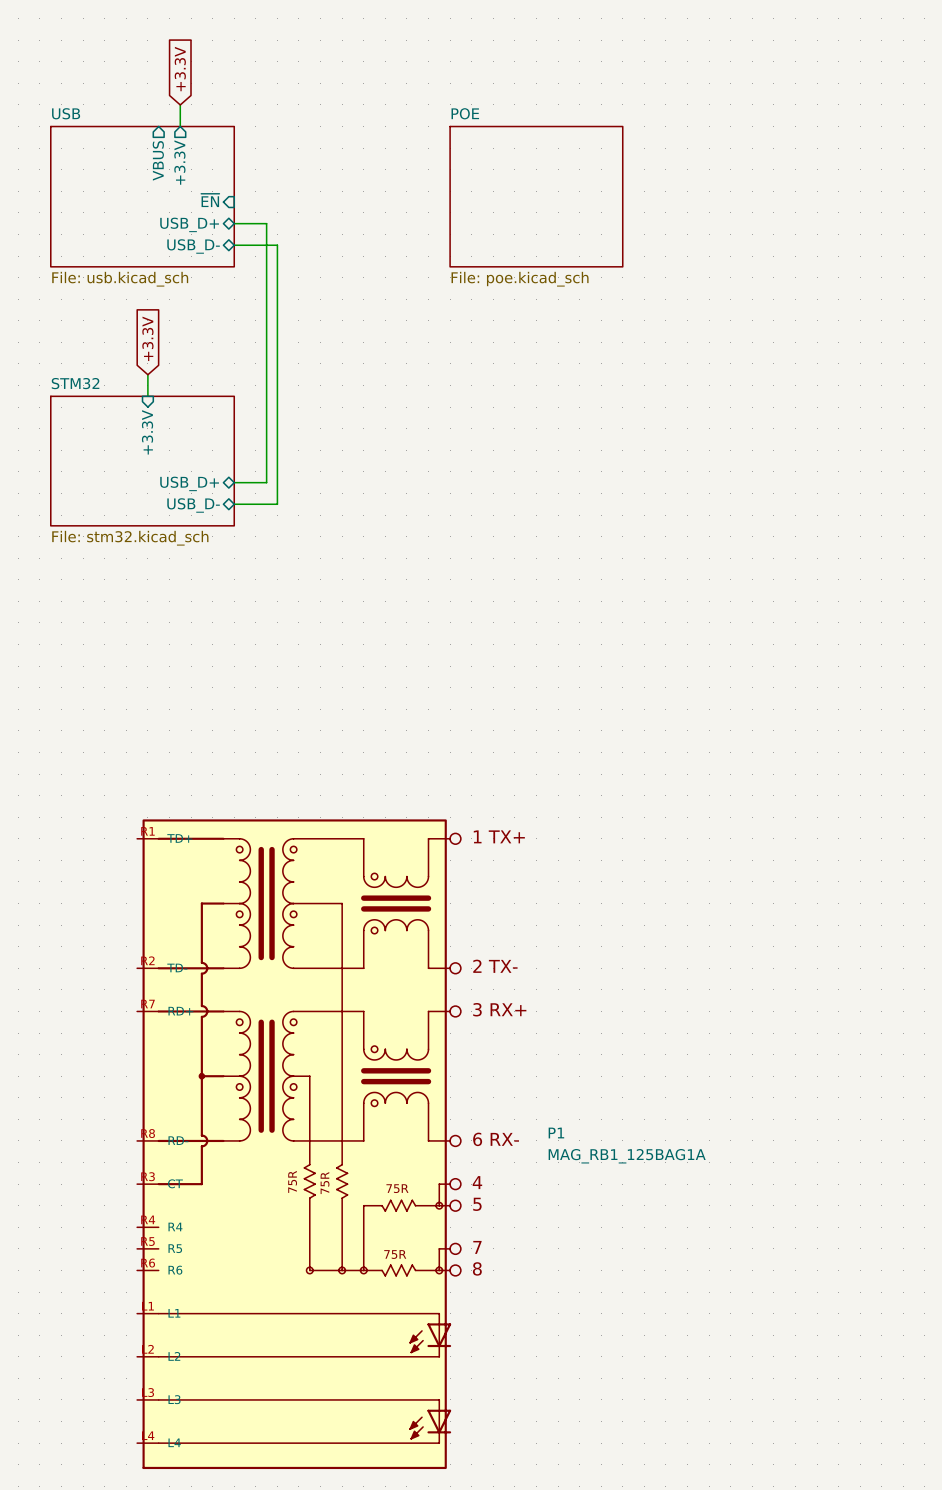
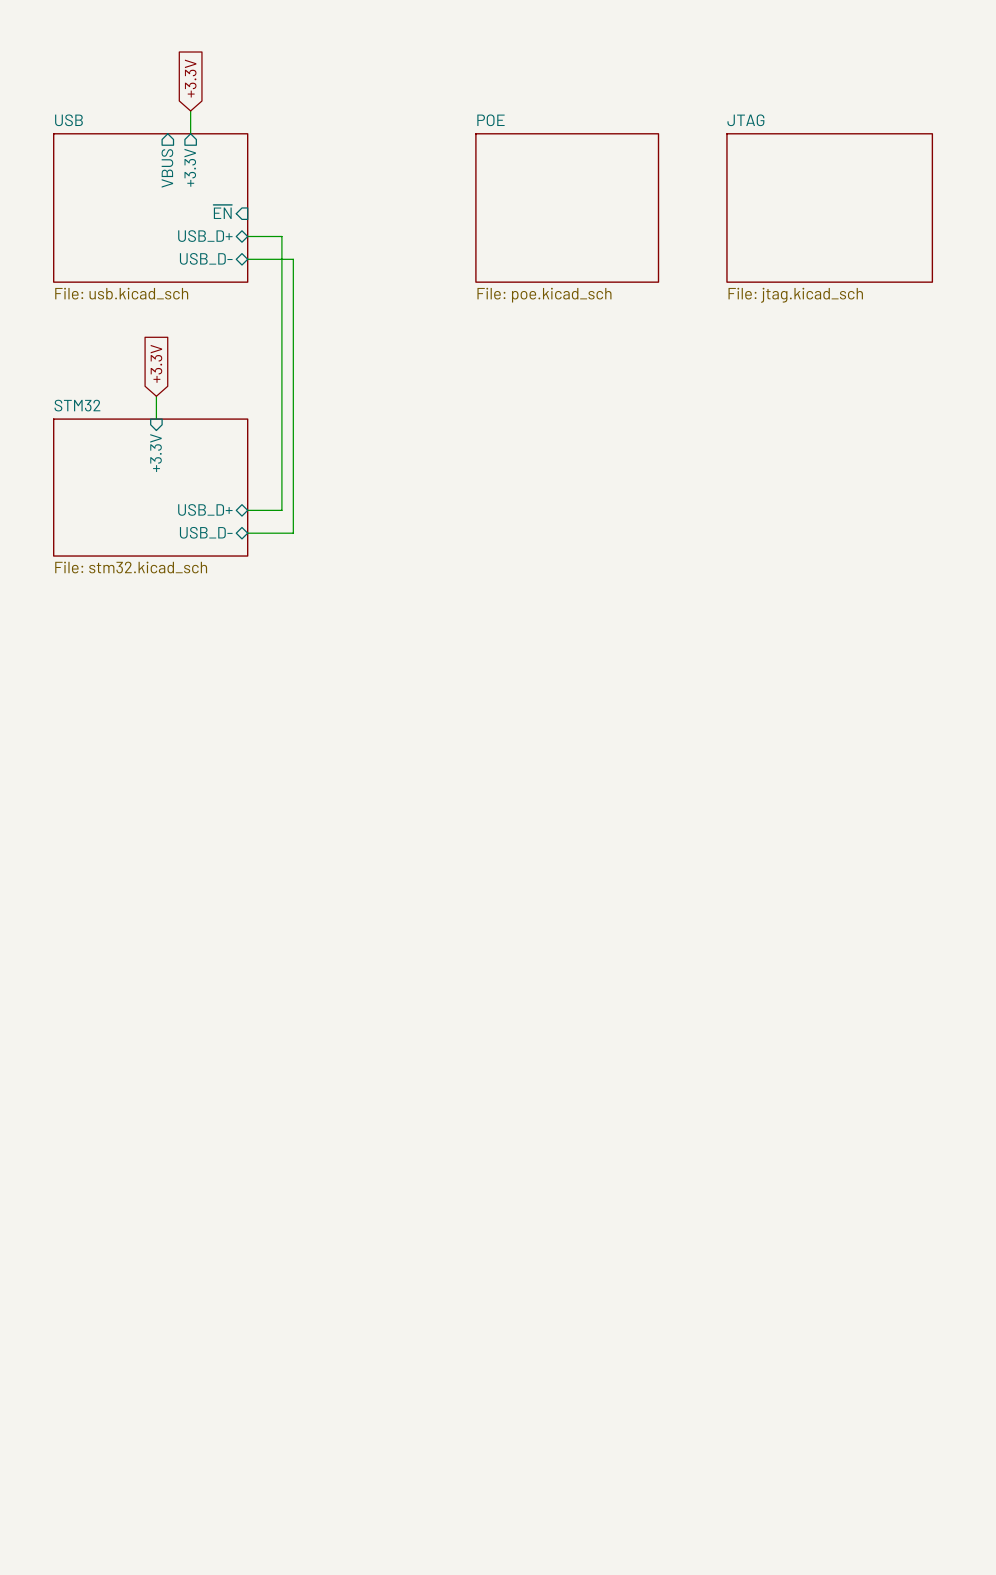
sheet JTAG: none -> File: jtag.kicad_sch (829, 207)
P1: MAG_RB1_125BAG1A (299, 1144) -> none

